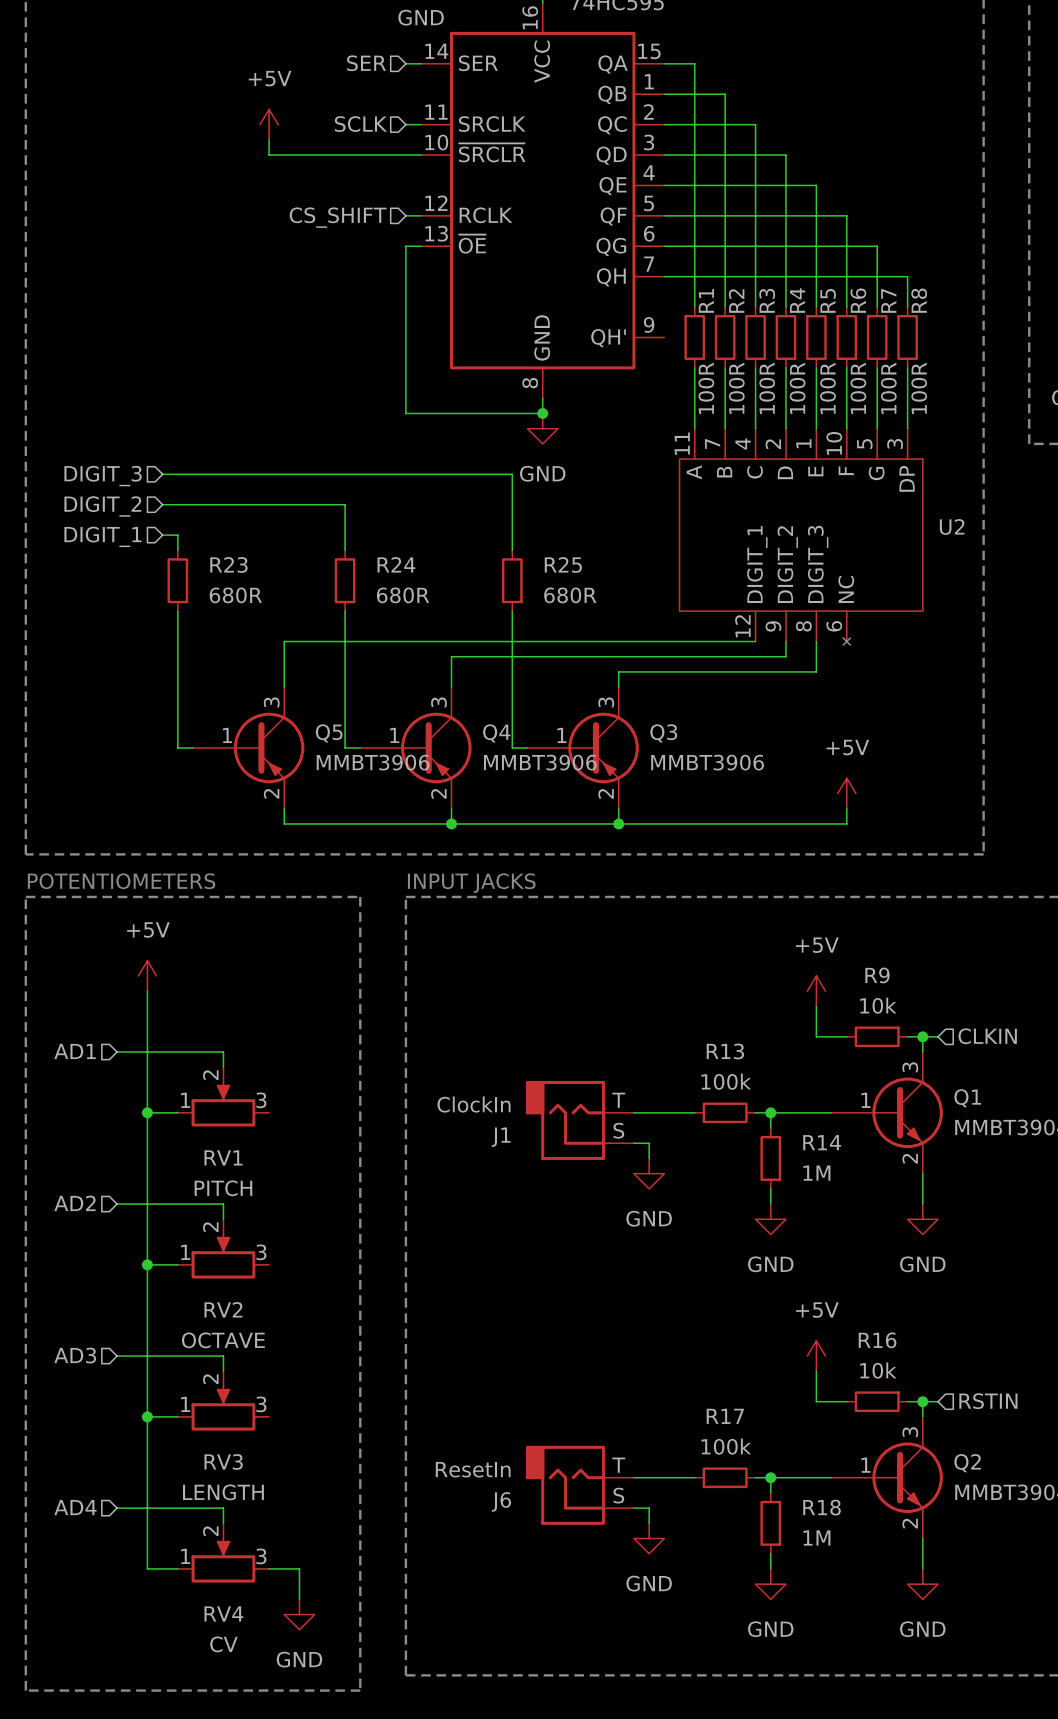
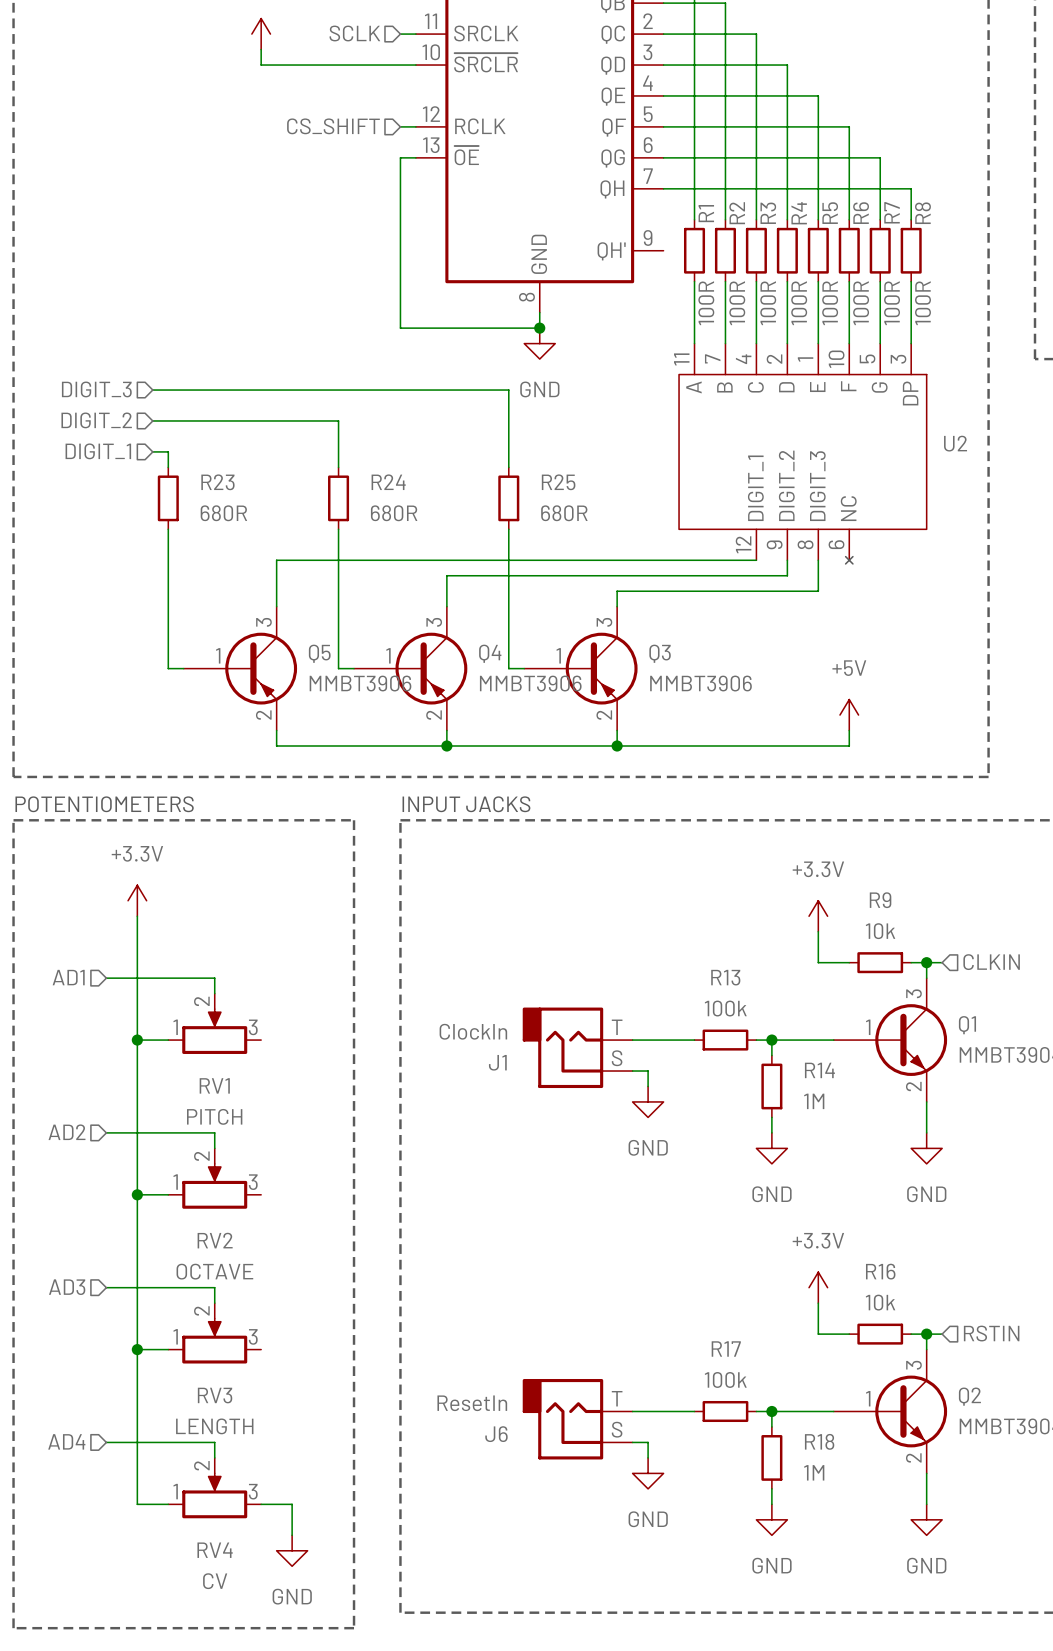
power symbol: +5V (147, 976) -> +3.3V (137, 900)
power symbol: +5V (816, 991) -> +3.3V (818, 916)
power symbol: +5V (816, 1356) -> +3.3V (818, 1287)

